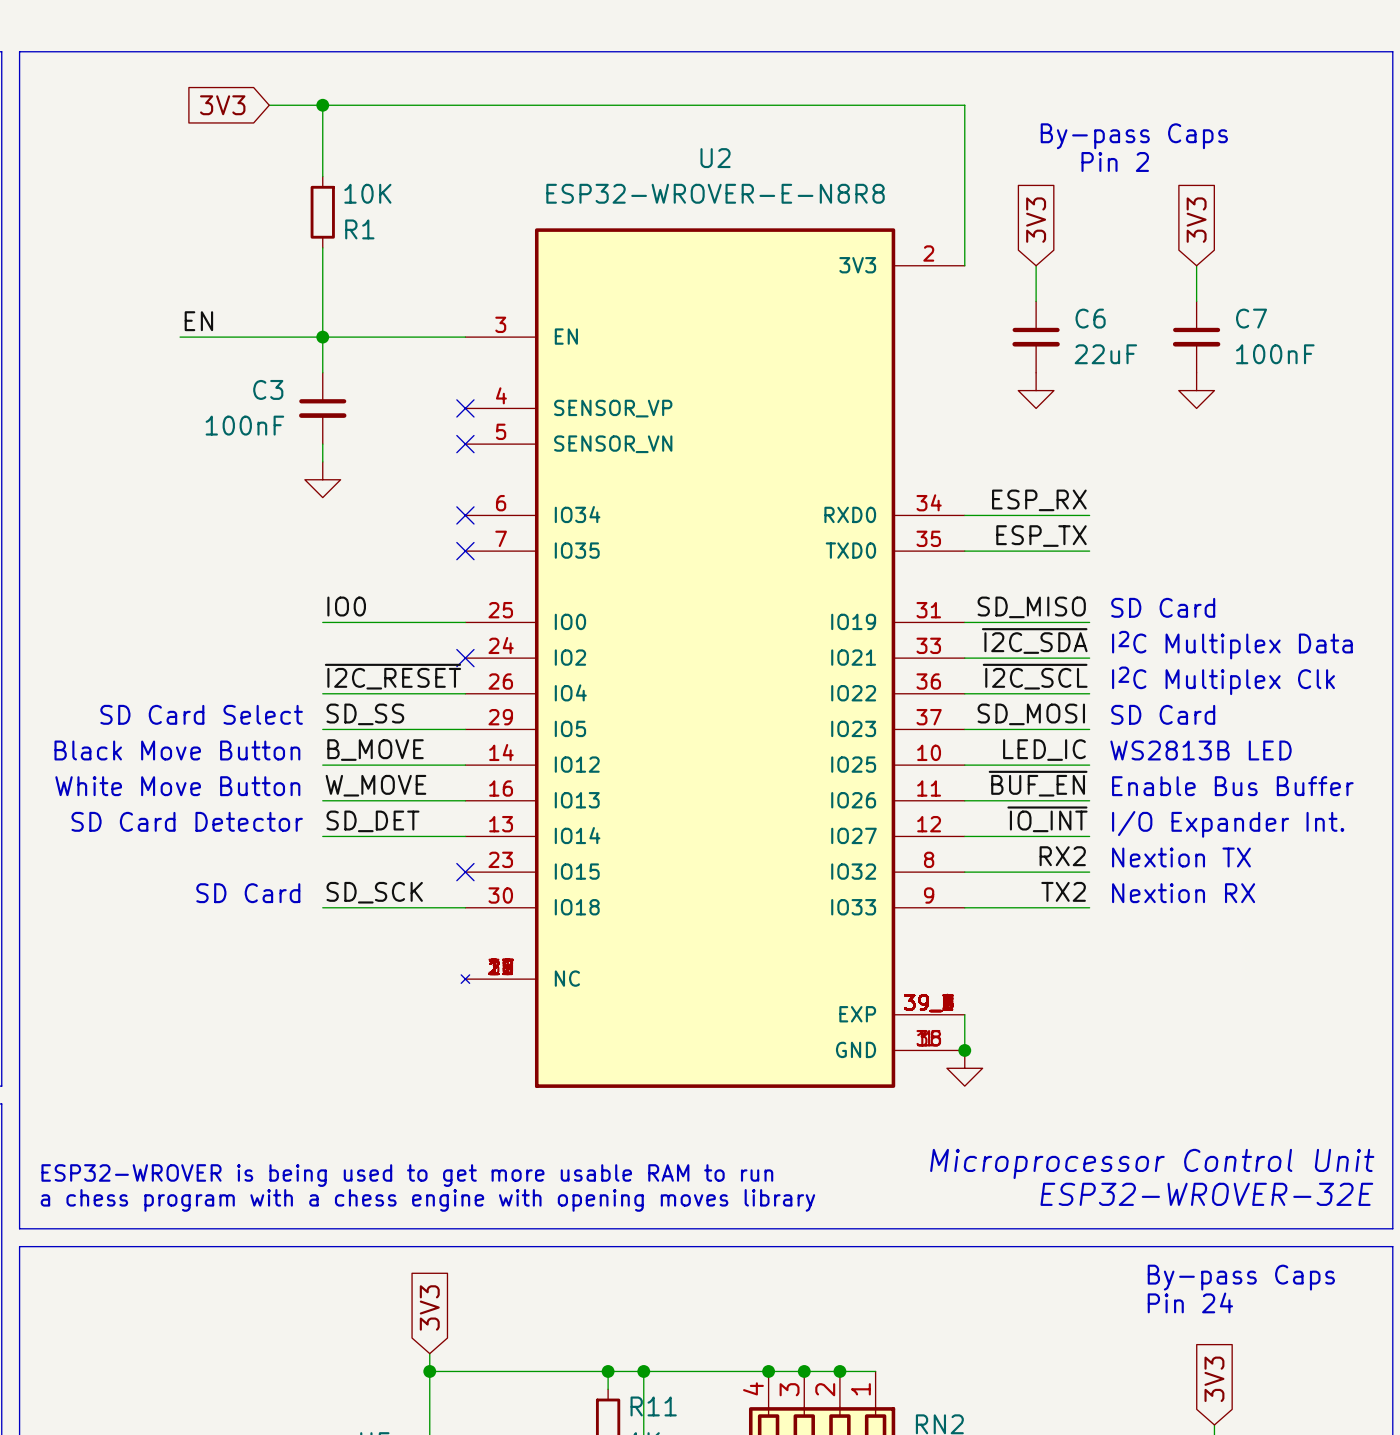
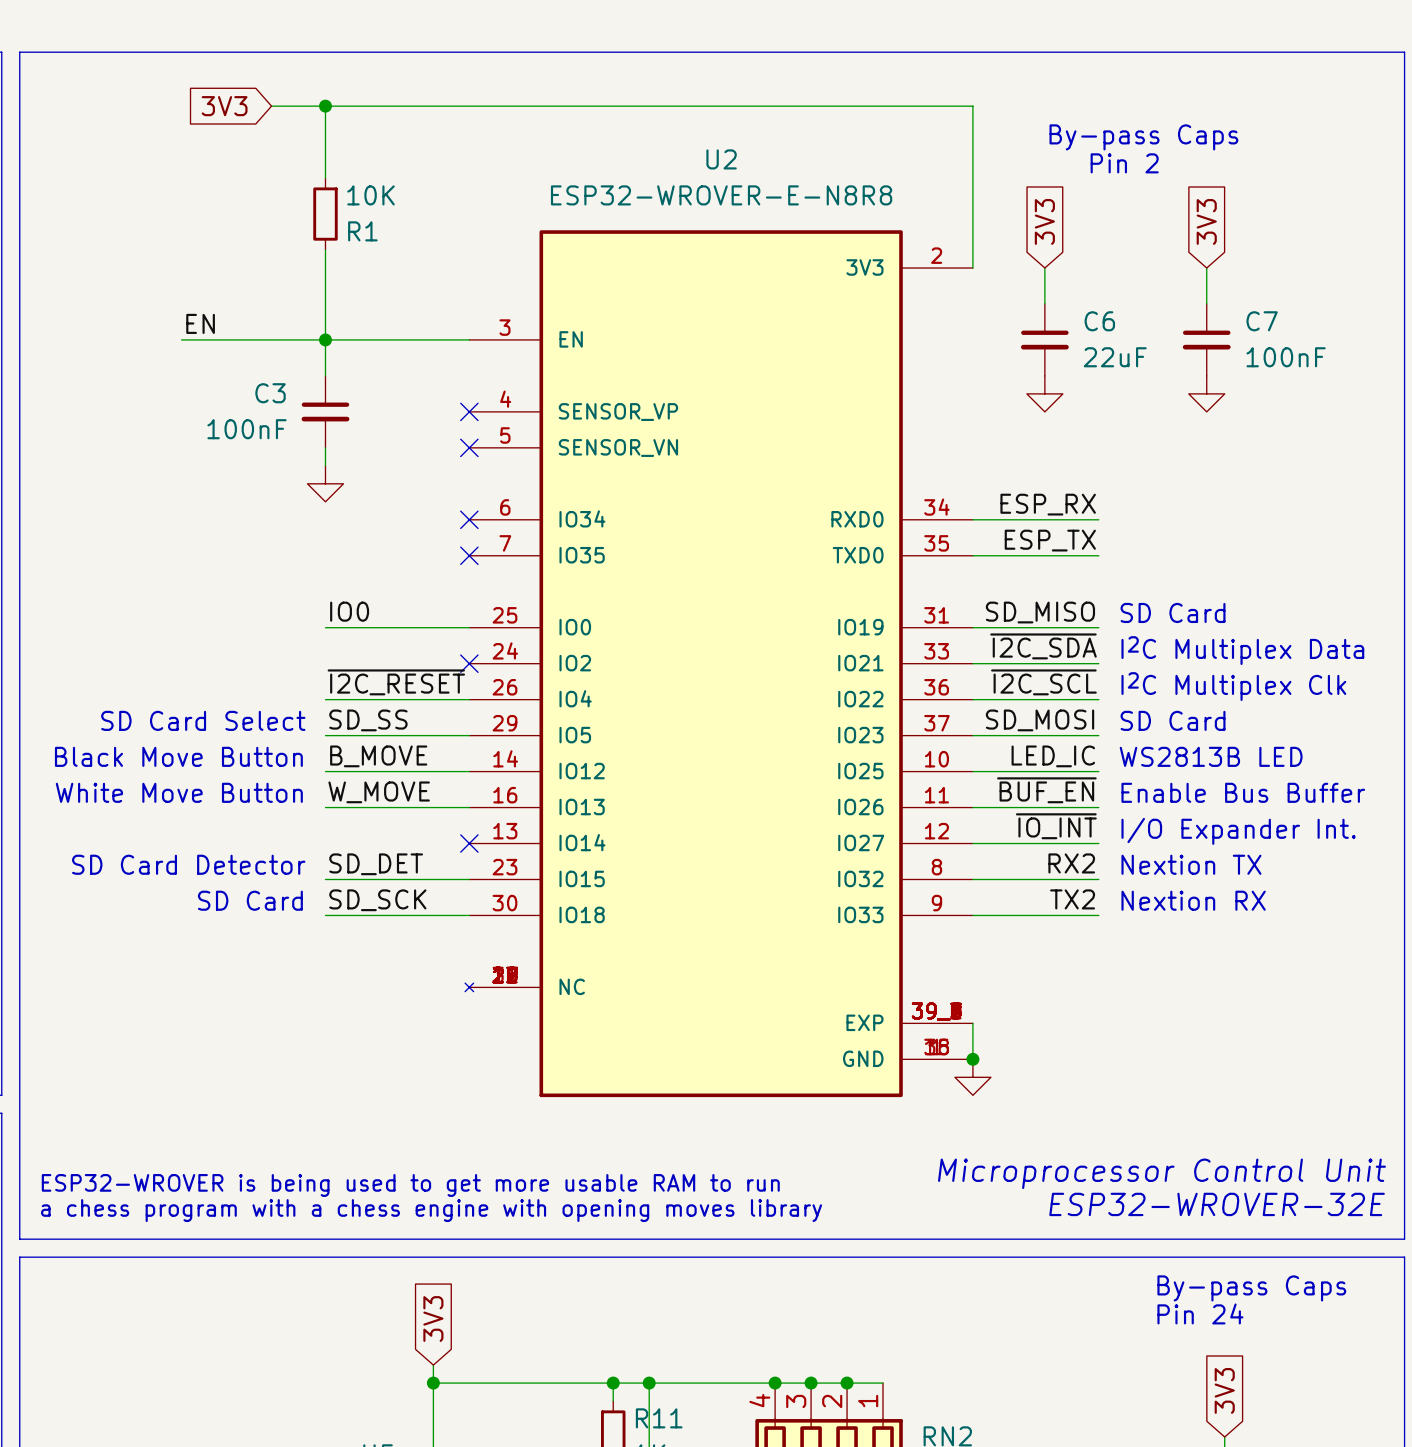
text position: SD Card Detector (187, 821) -> SD Card Detector (188, 864)
label position: SD_DET (372, 821) -> SD_DET (376, 864)
wire: (322, 836) (465, 836) -> (325, 879) (469, 879)
no-connect mark position: (465, 872) -> (469, 843)

